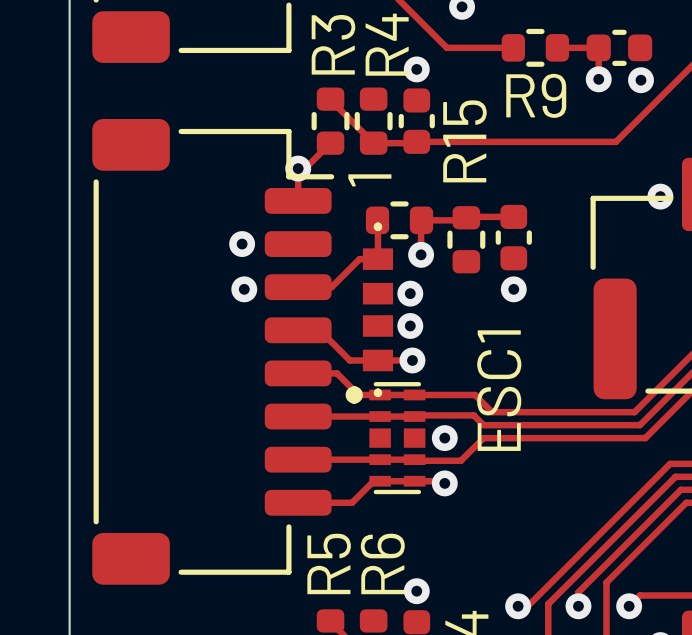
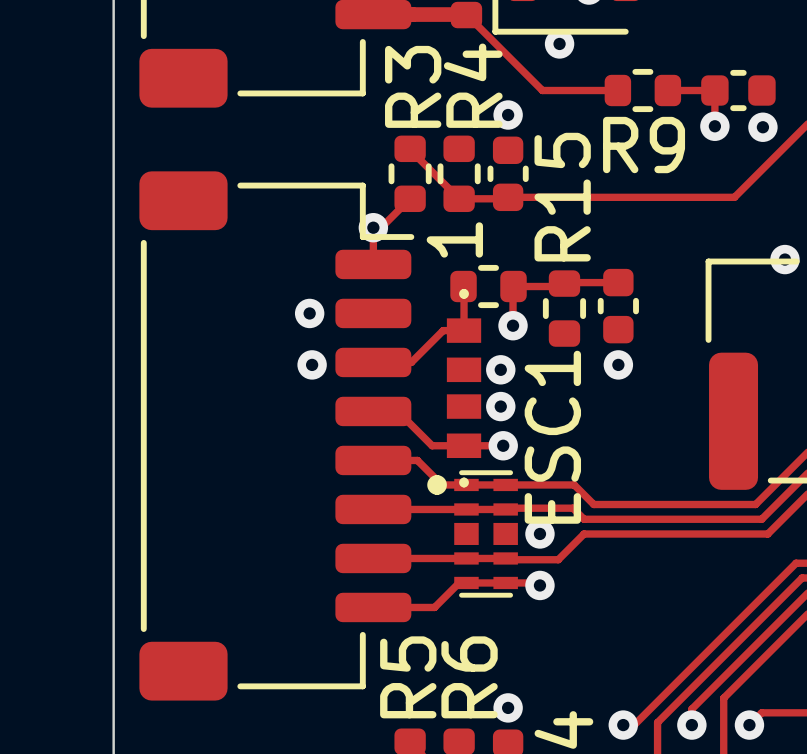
part value position: ESC1 (499, 390) -> ESC1 (552, 437)

